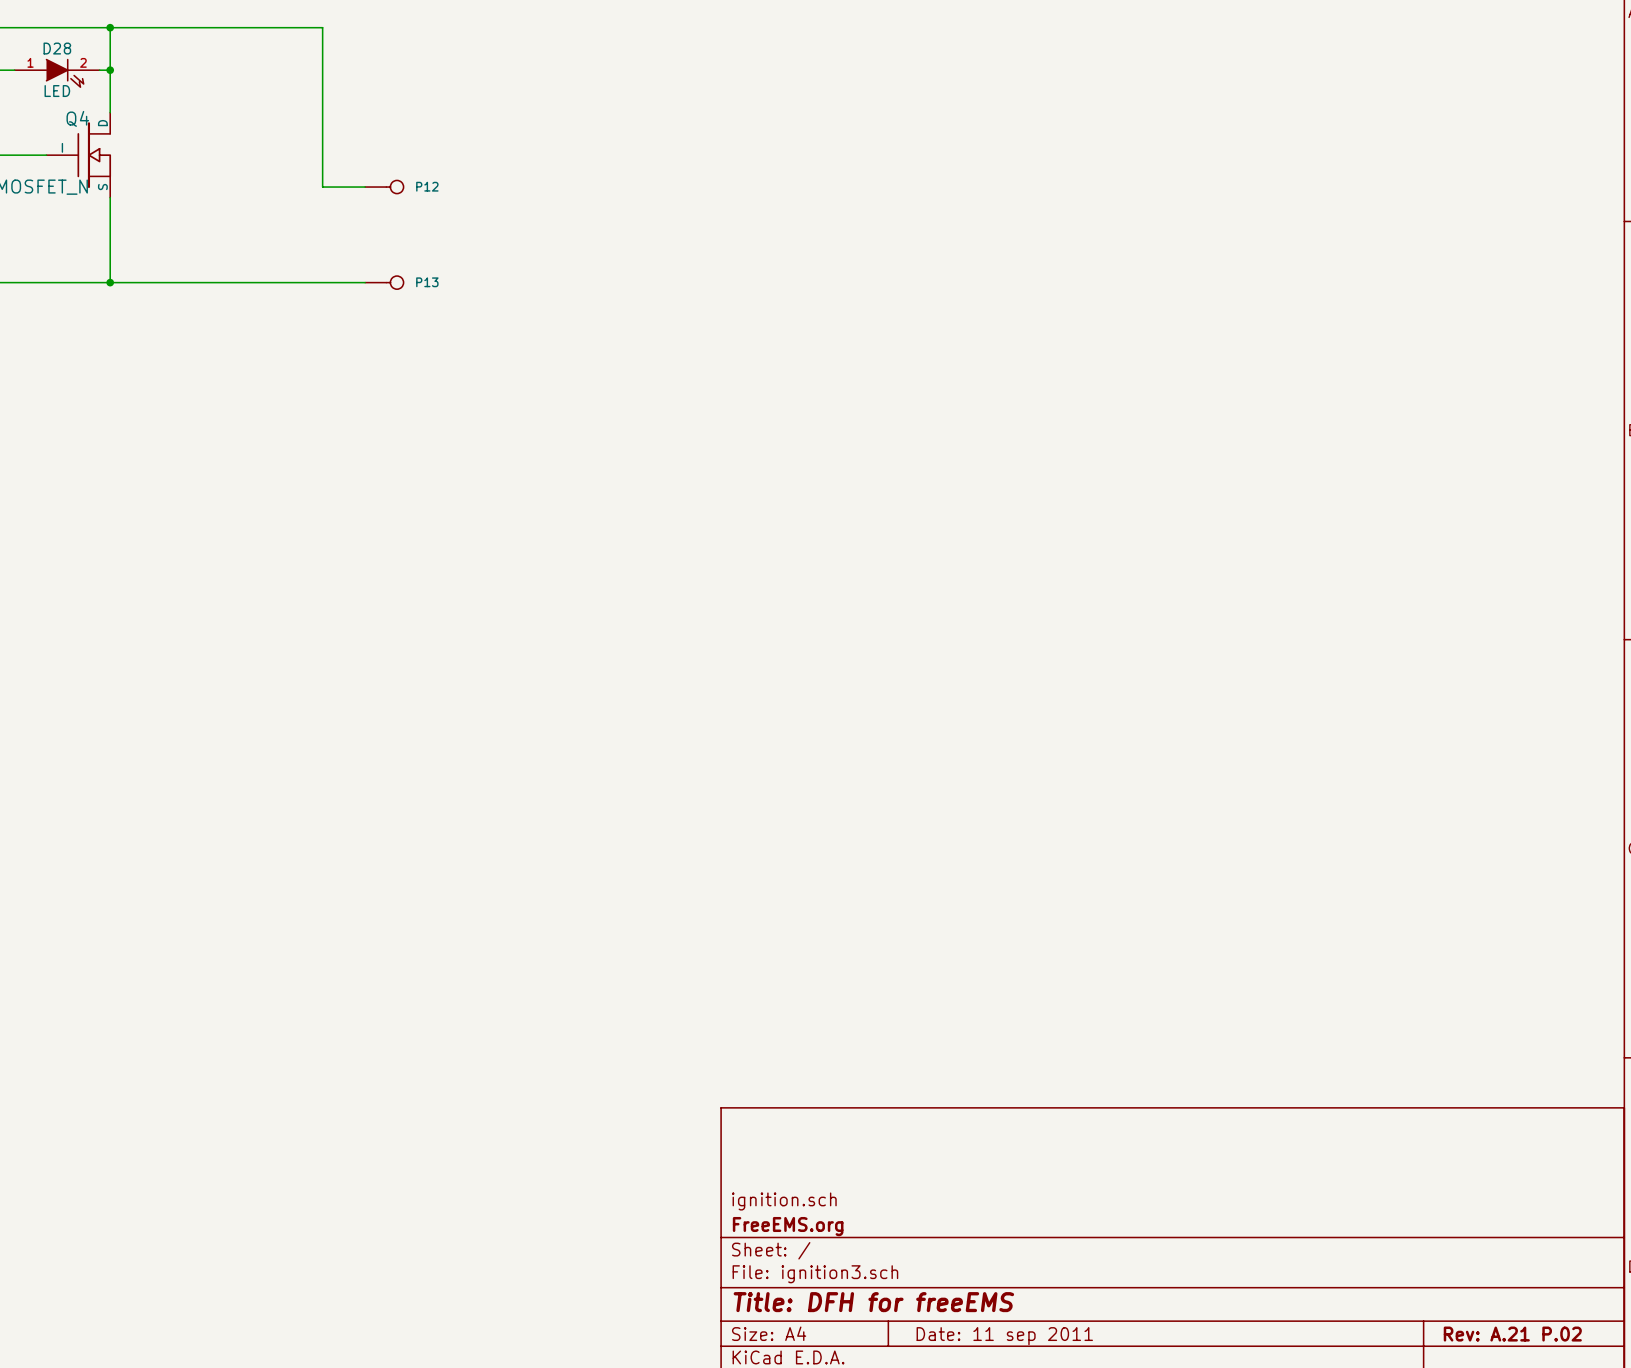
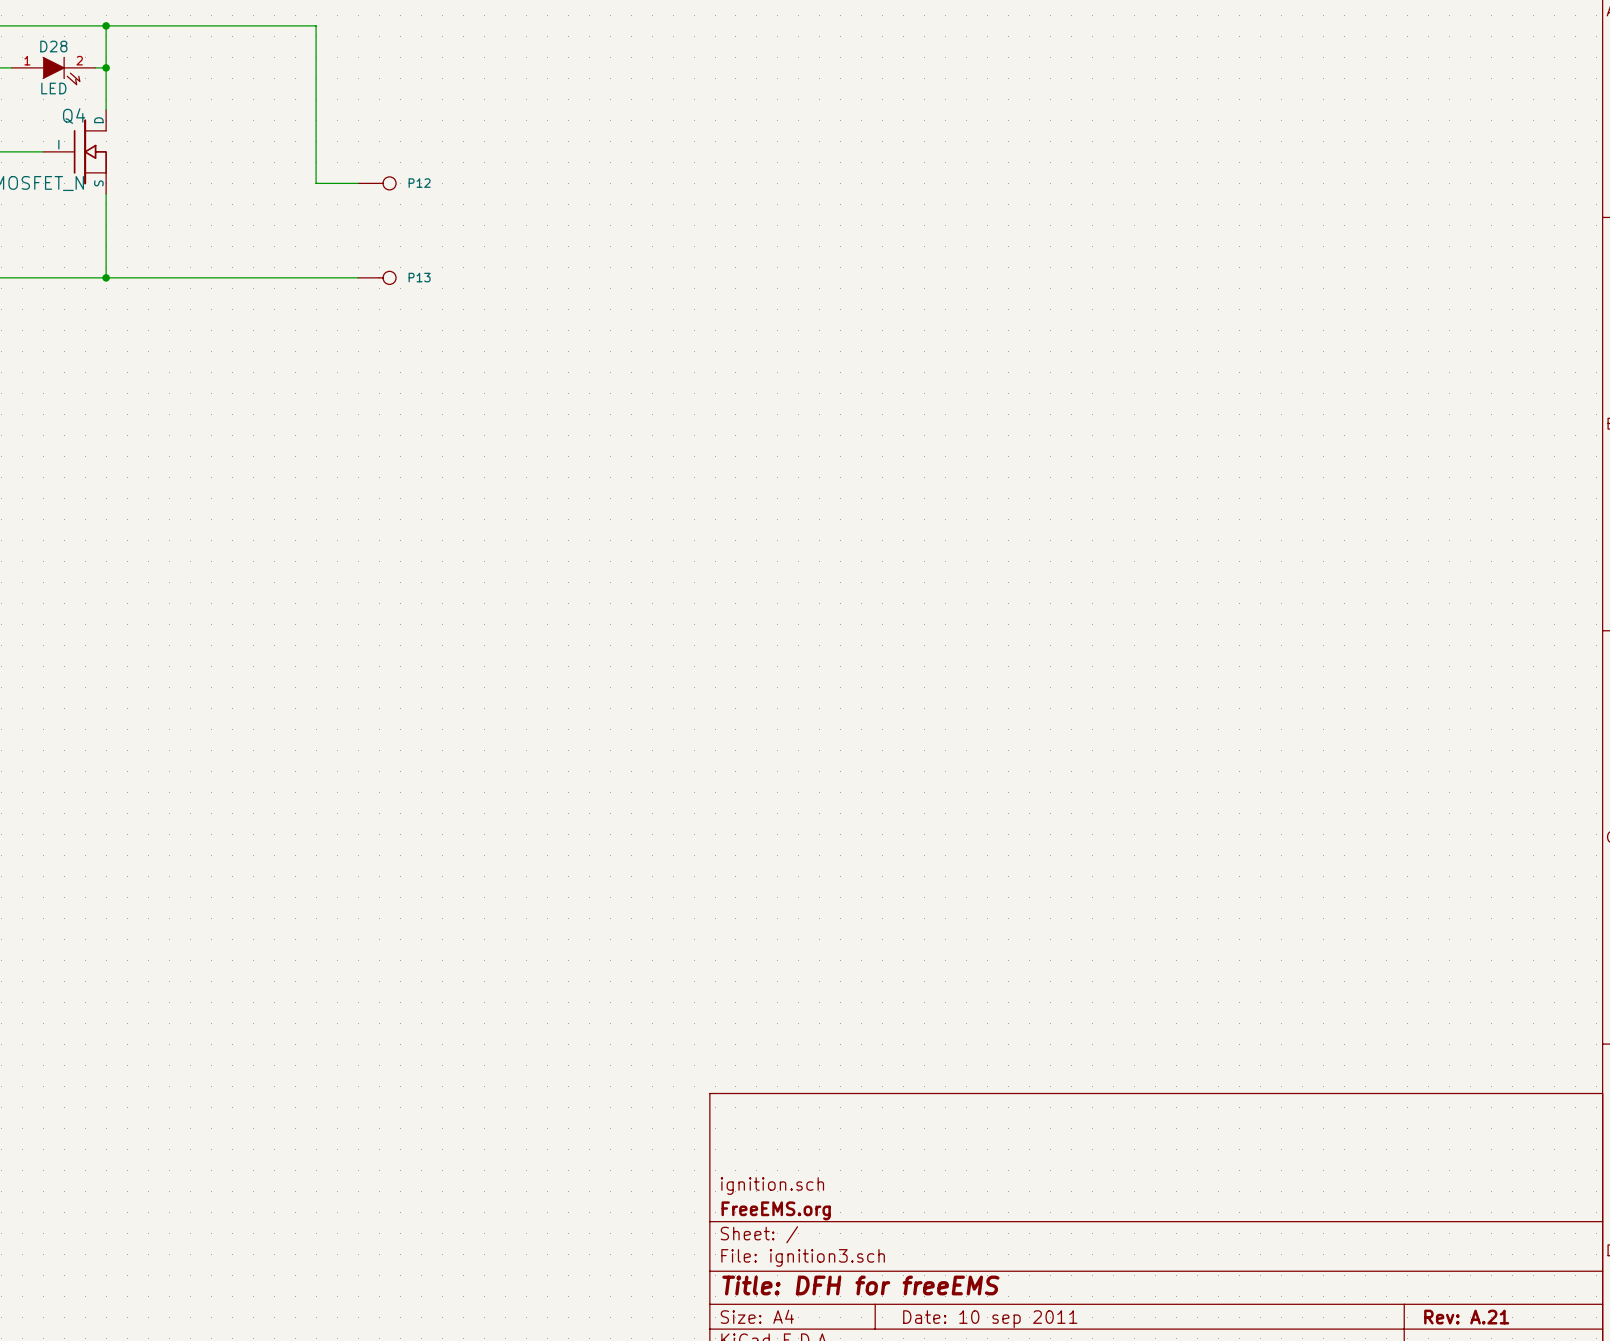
title block: Rev: A.21 P.02 (1512, 1334) -> Rev: A.21 (1466, 1317)
title block: Date: 11 sep 2011 (1004, 1336) -> Date: 10 sep 2011 (990, 1319)

